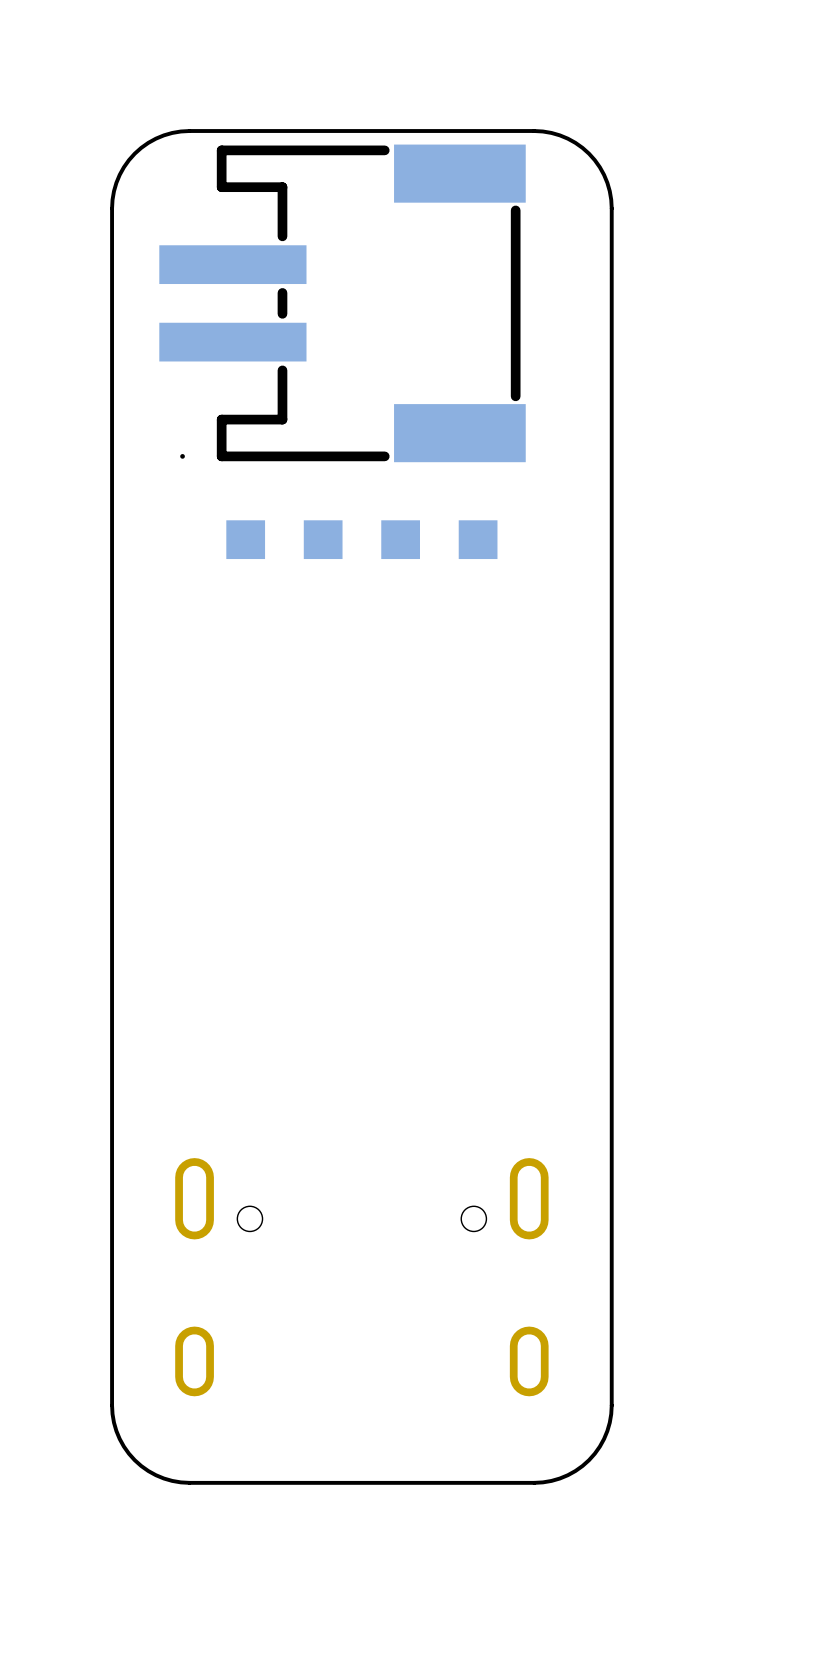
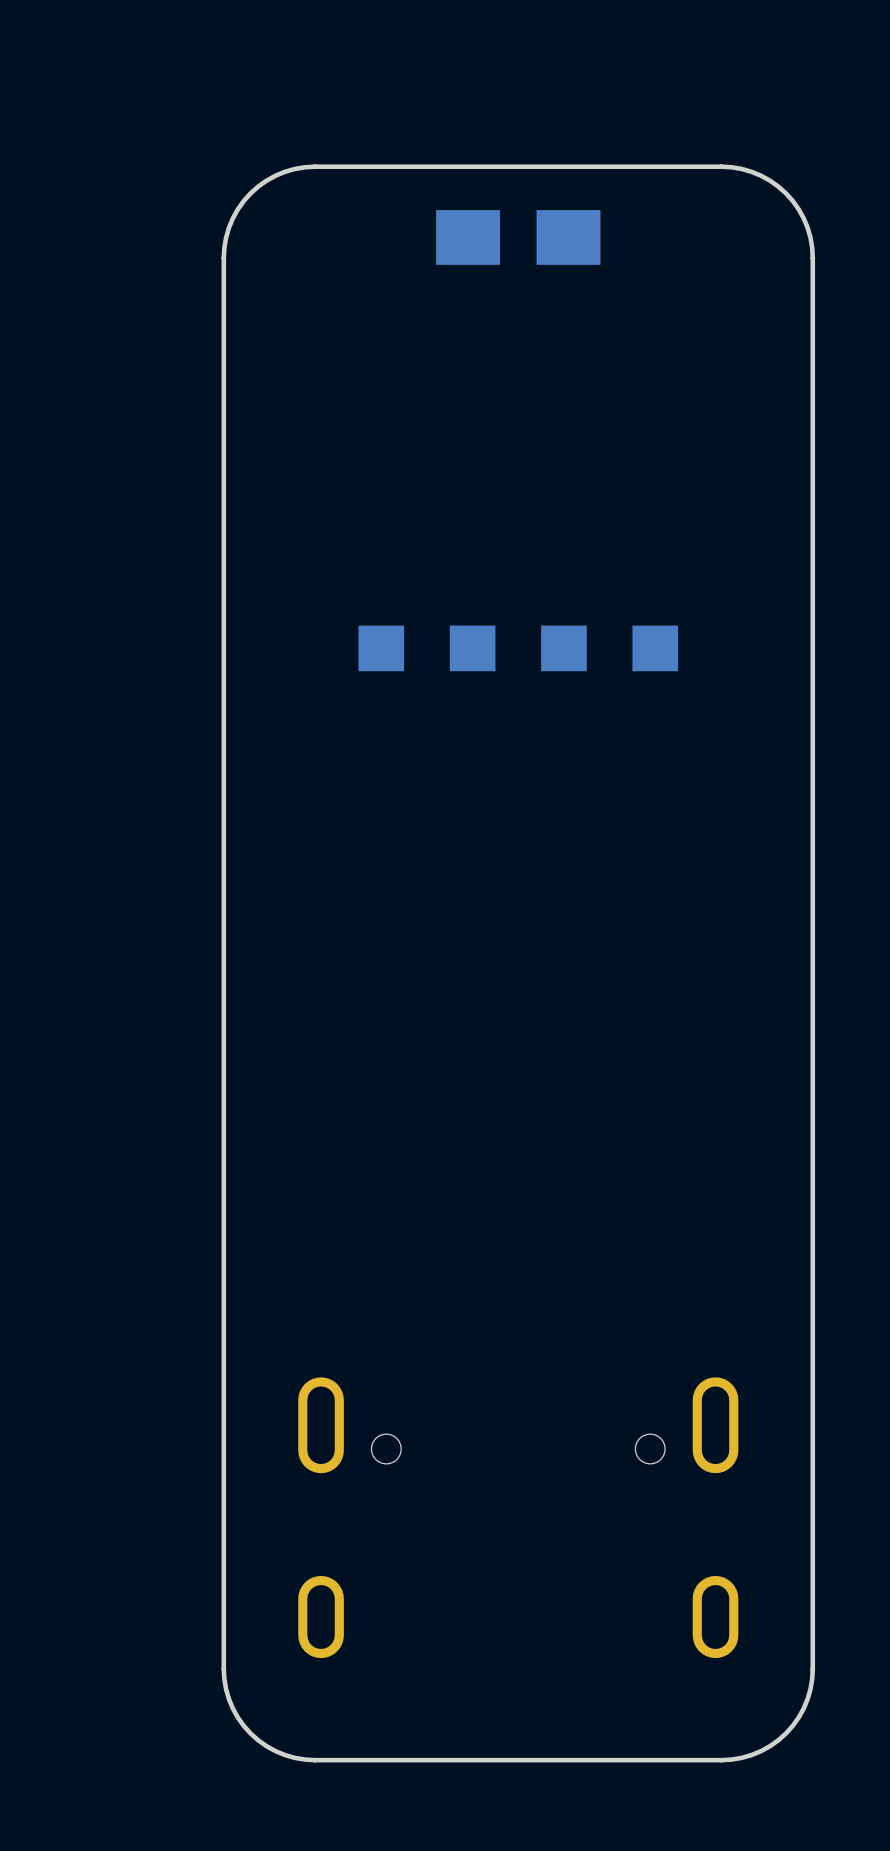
part: none -> (518, 237)
part: (342, 303) -> none

